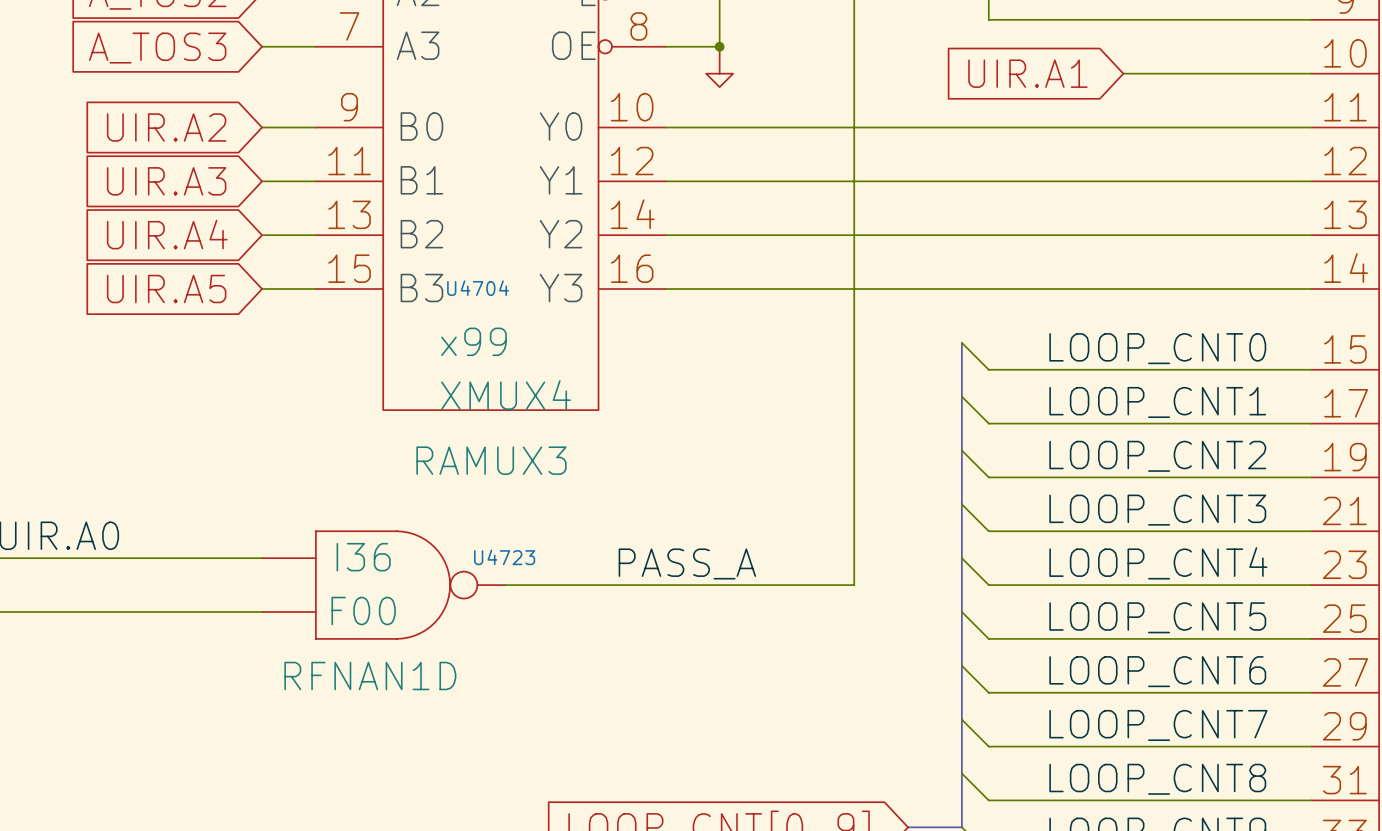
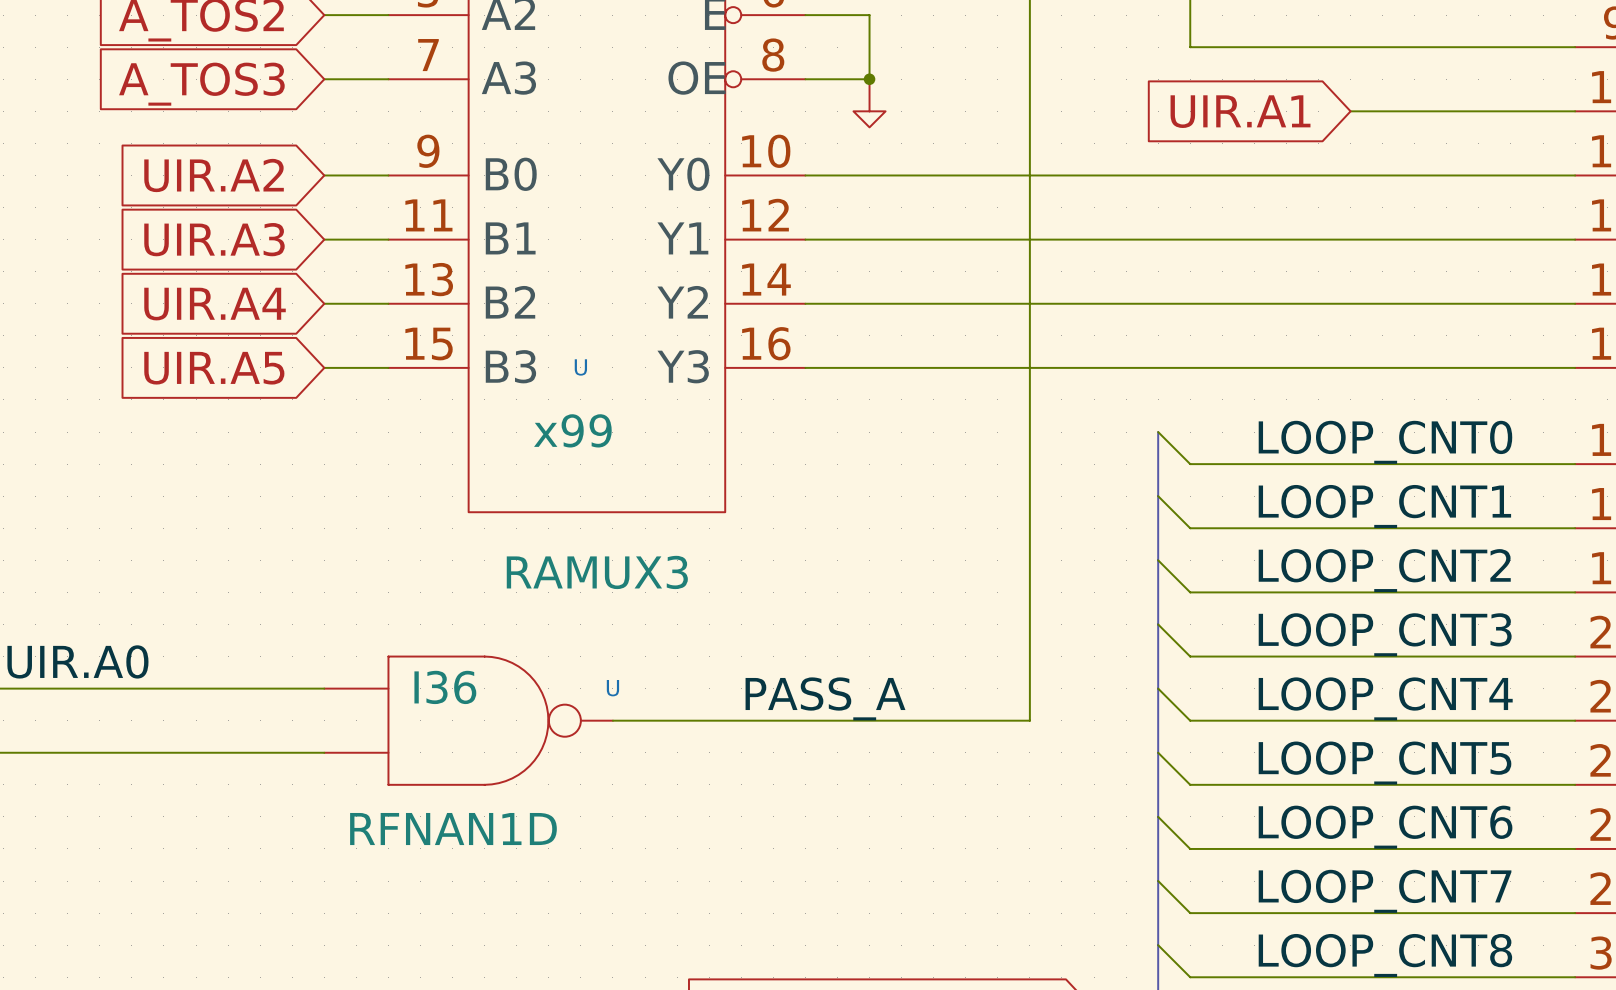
U4704 name: U4704 (478, 288) -> U (580, 367)
U4704 value: XMUX4 (506, 395) -> none
U4723 name: U4723 (504, 557) -> U (612, 688)
U4723 value: F00 (363, 610) -> none

